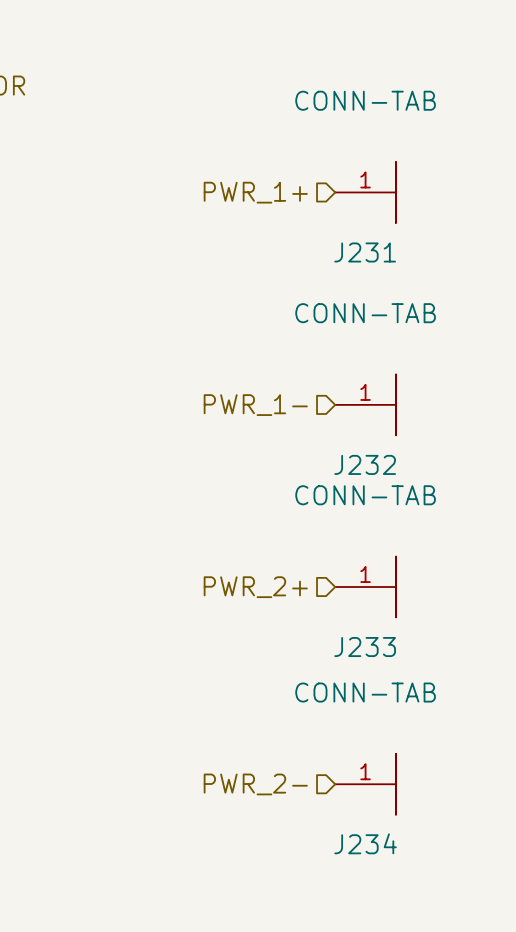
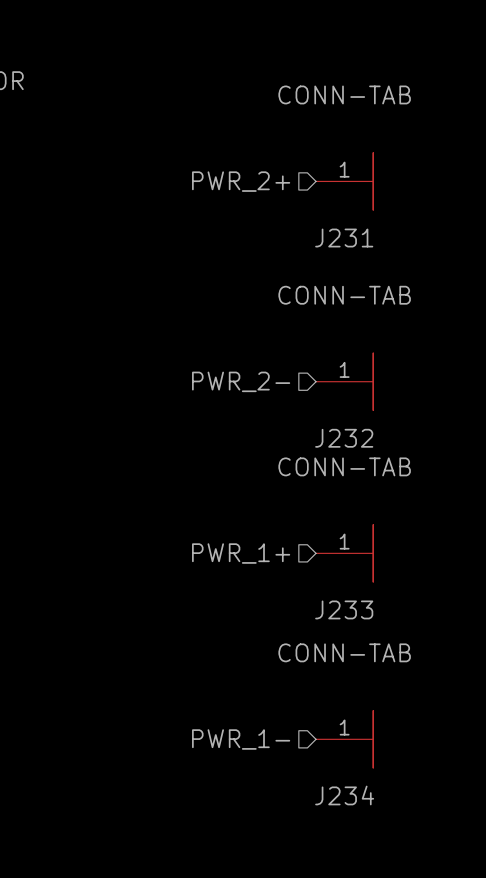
hierarchical label: PWR_1+ (255, 192) -> PWR_2+ (241, 181)
hierarchical label: PWR_1- (255, 405) -> PWR_2- (241, 381)
hierarchical label: PWR_2+ (255, 587) -> PWR_1+ (241, 553)
hierarchical label: PWR_2- (255, 784) -> PWR_1- (241, 739)

